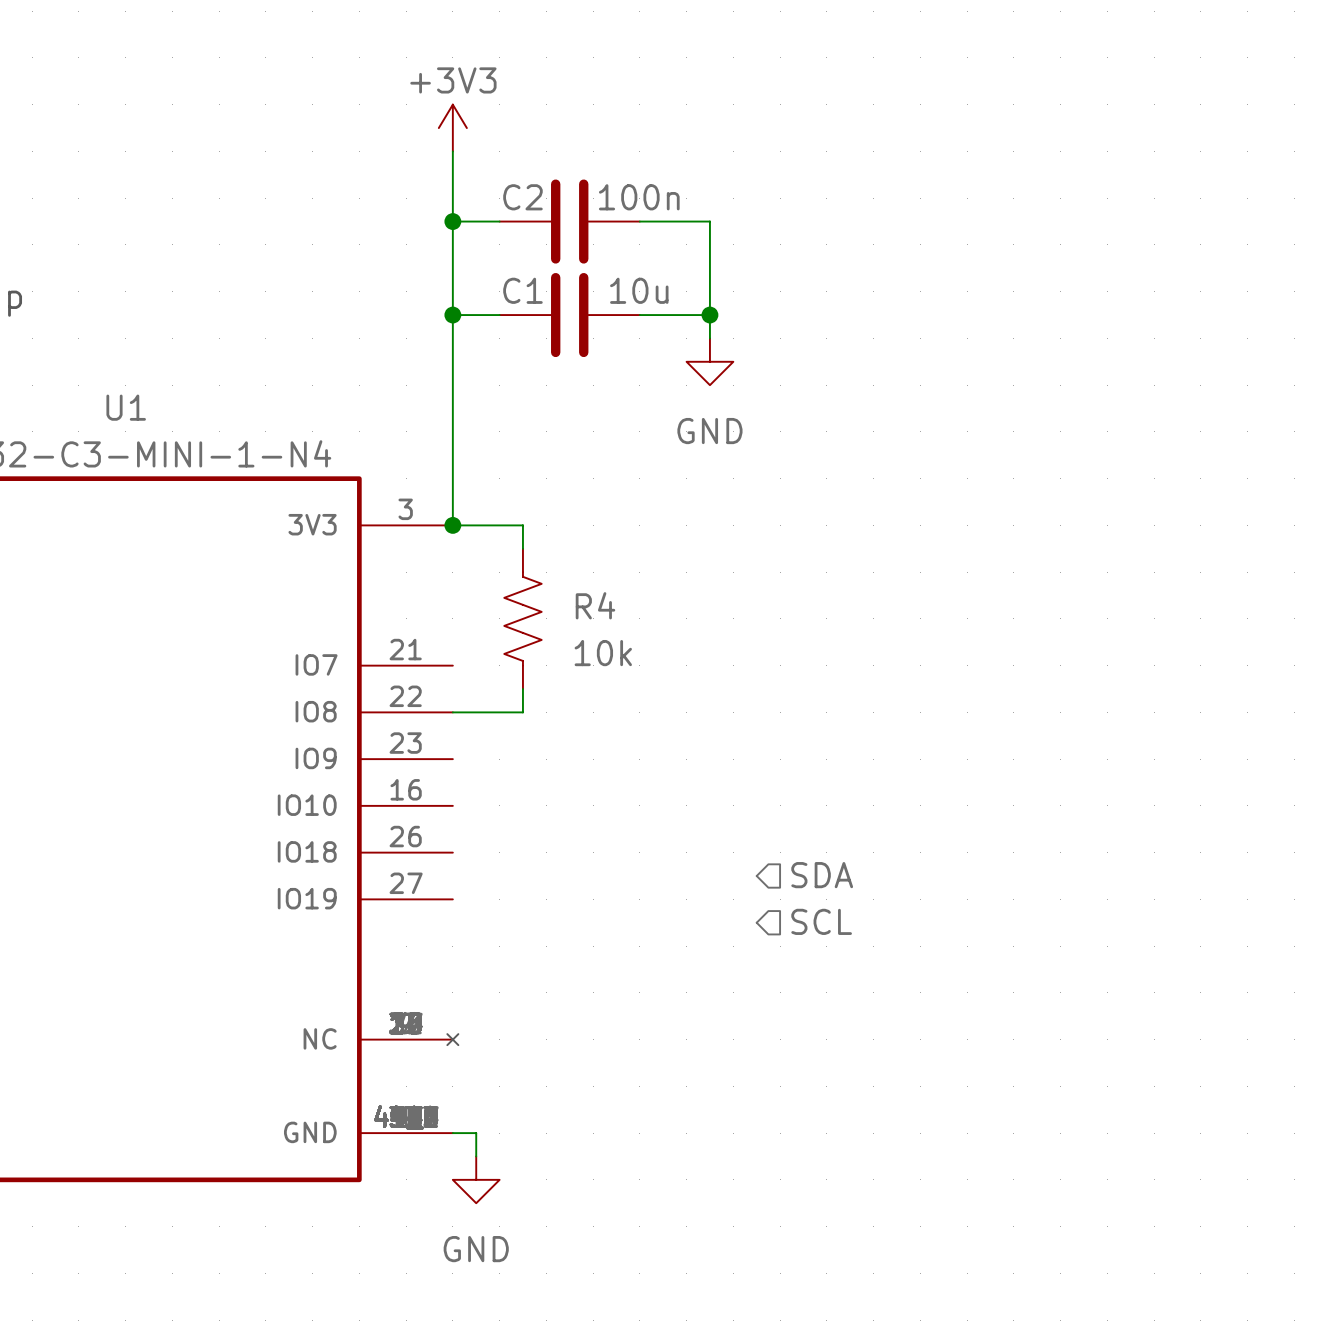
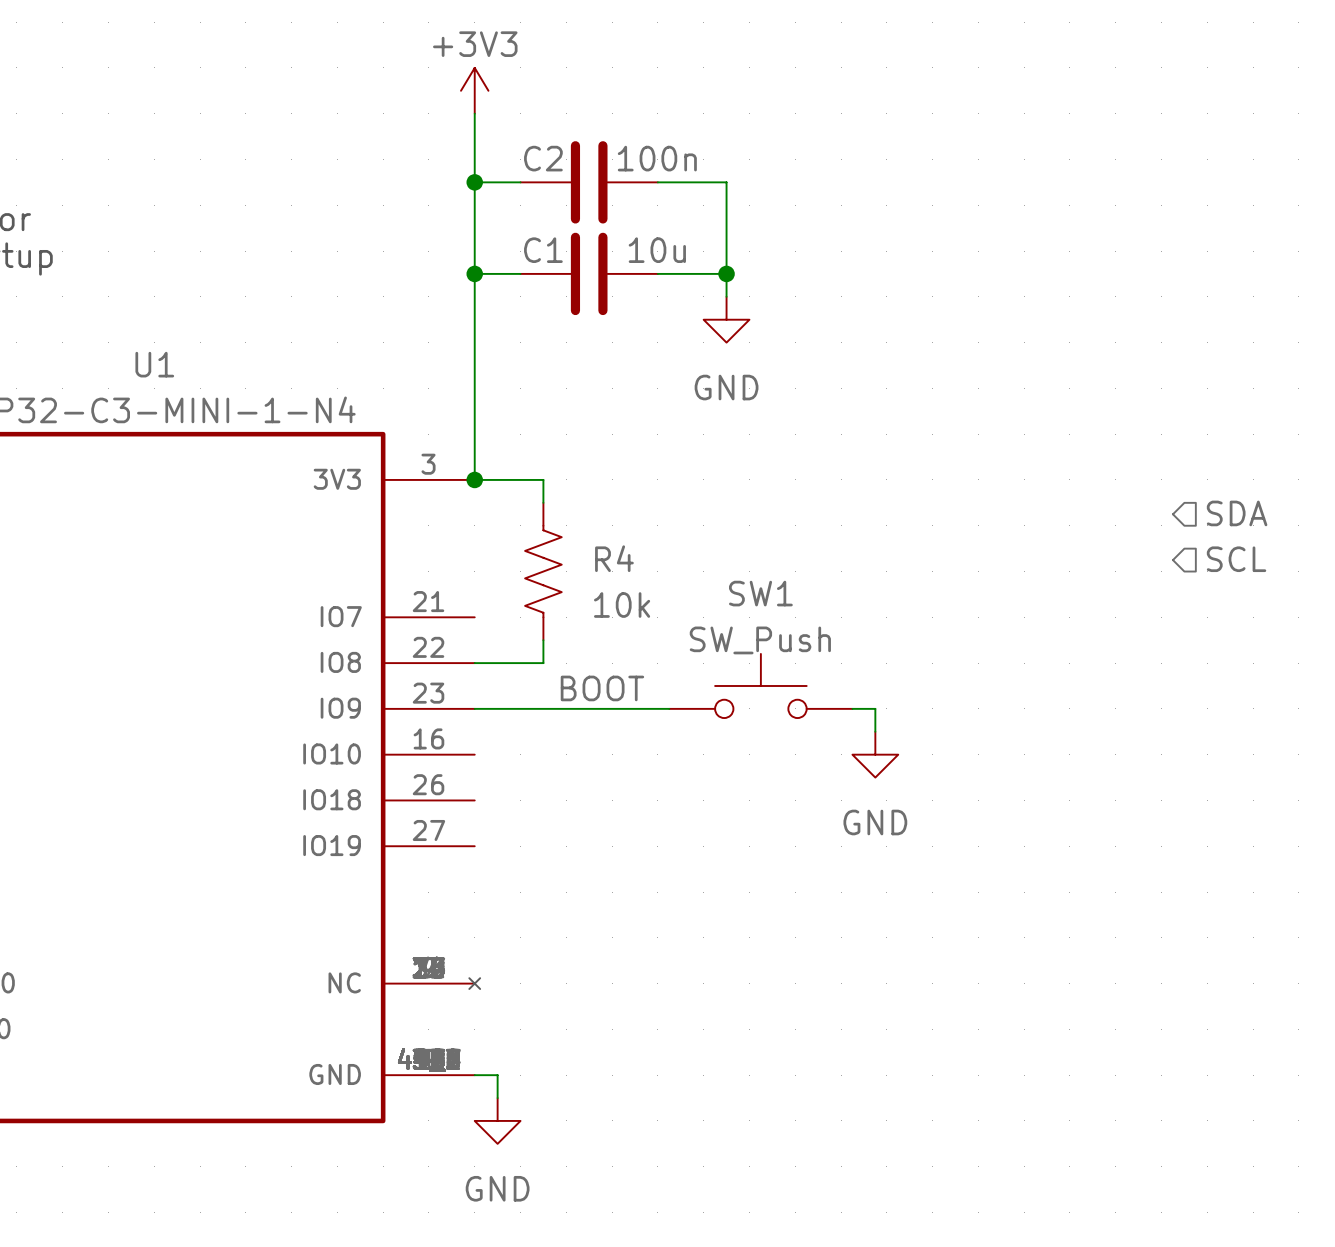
hierarchical label: none -> SDA (1237, 513)
hierarchical label: none -> SCL (1236, 559)
SW1: none -> SW_Push (760, 685)
label: none -> BOOT (602, 688)
wire: none -> (474, 708) (669, 708)
wire: none -> (852, 708) (875, 708) (875, 731)
power symbol: none -> GND (875, 754)
hierarchical label: SDA (822, 875) -> none
hierarchical label: SCL (821, 921) -> none

